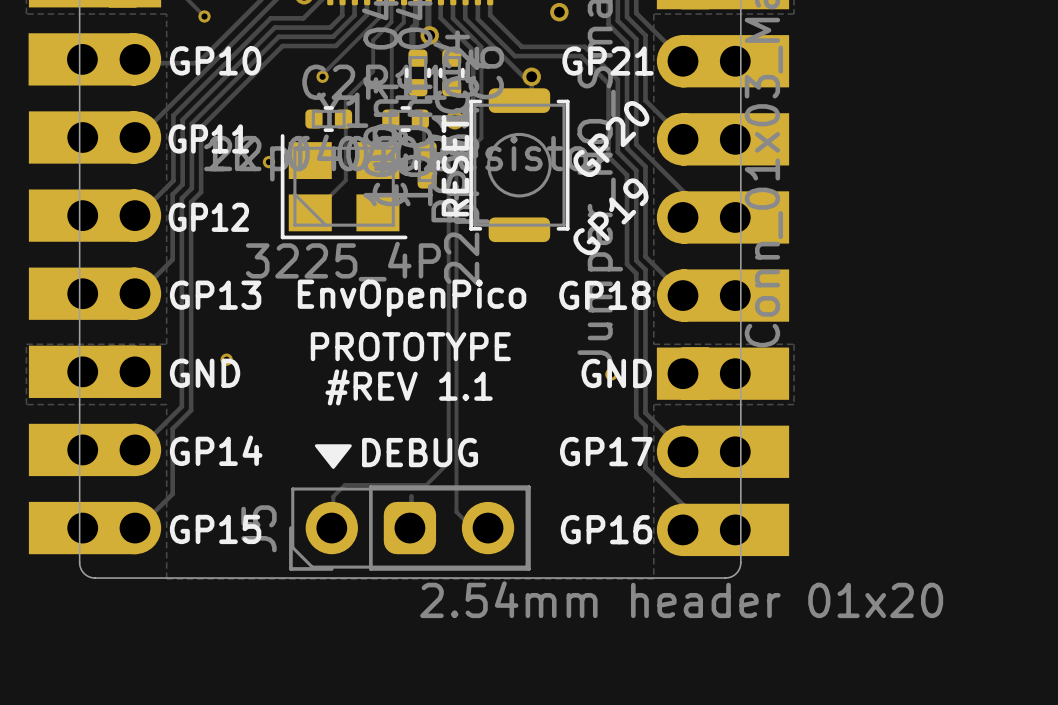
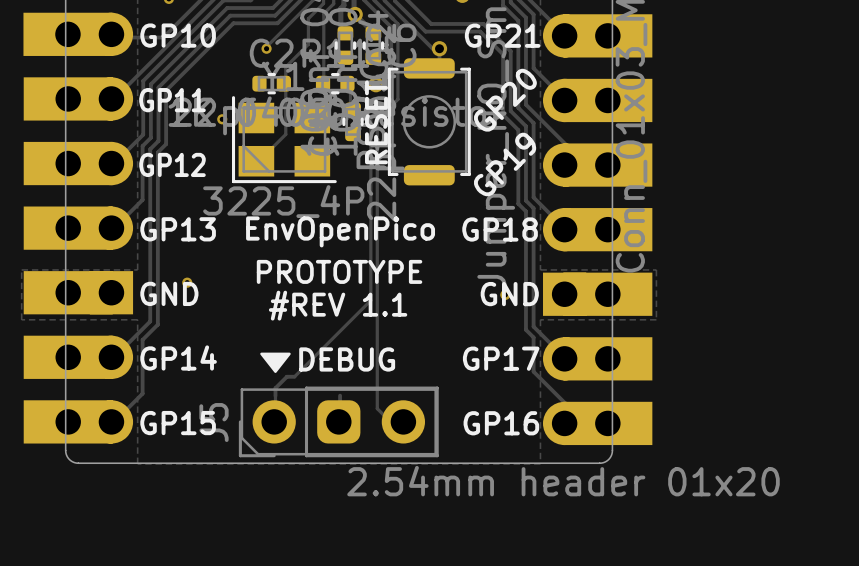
track: (448, 381) (448, 462) (426, 485) (344, 485) (333, 496) -> (370, 300) (294, 376) (286, 376) (275, 388) (275, 395)

